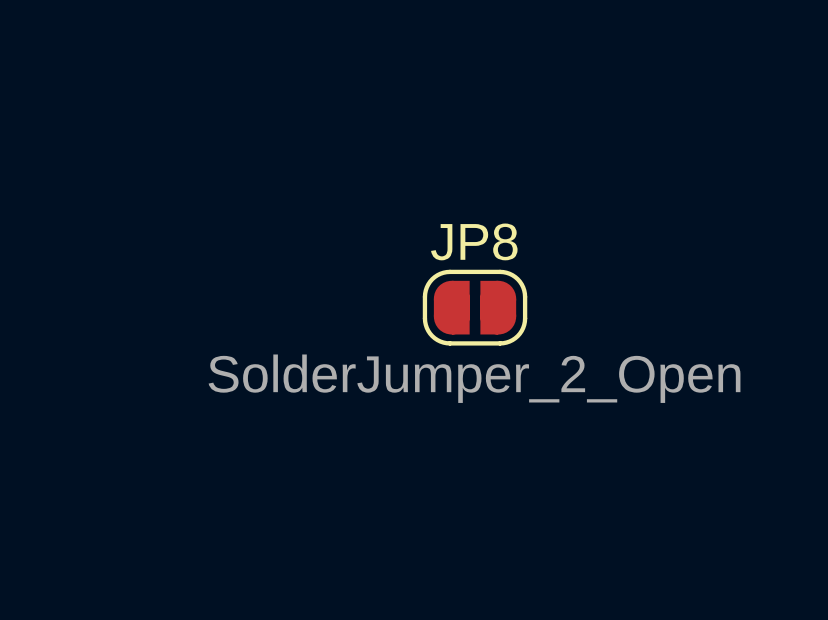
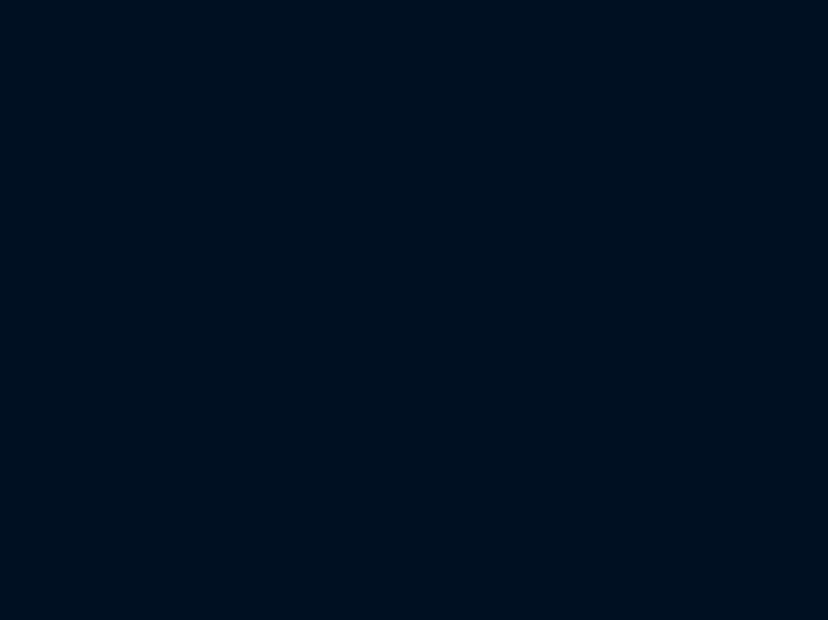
JP8: SolderJumper_2_Open (475, 307) -> none

